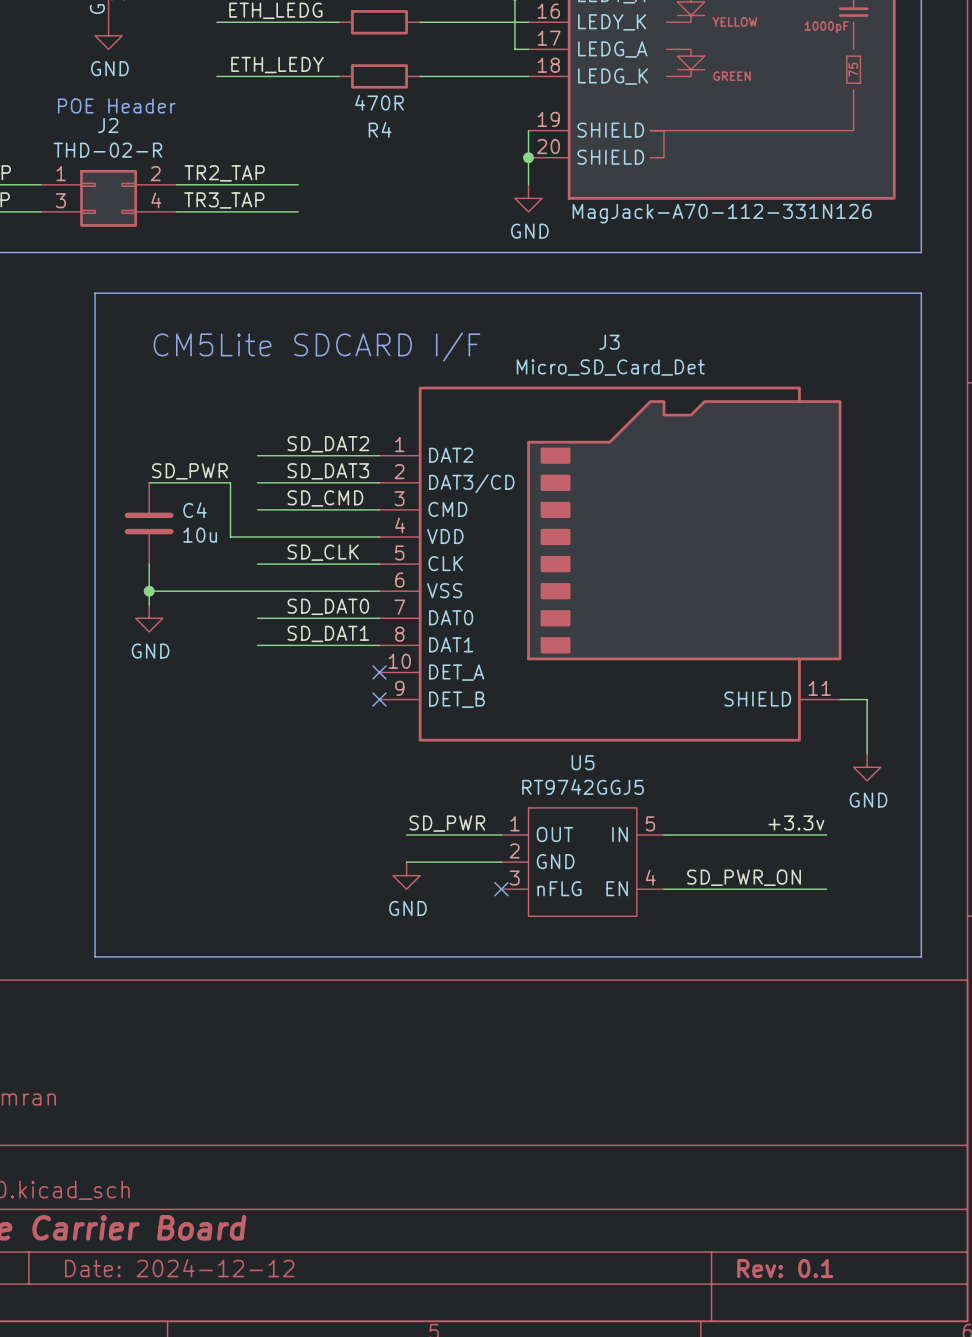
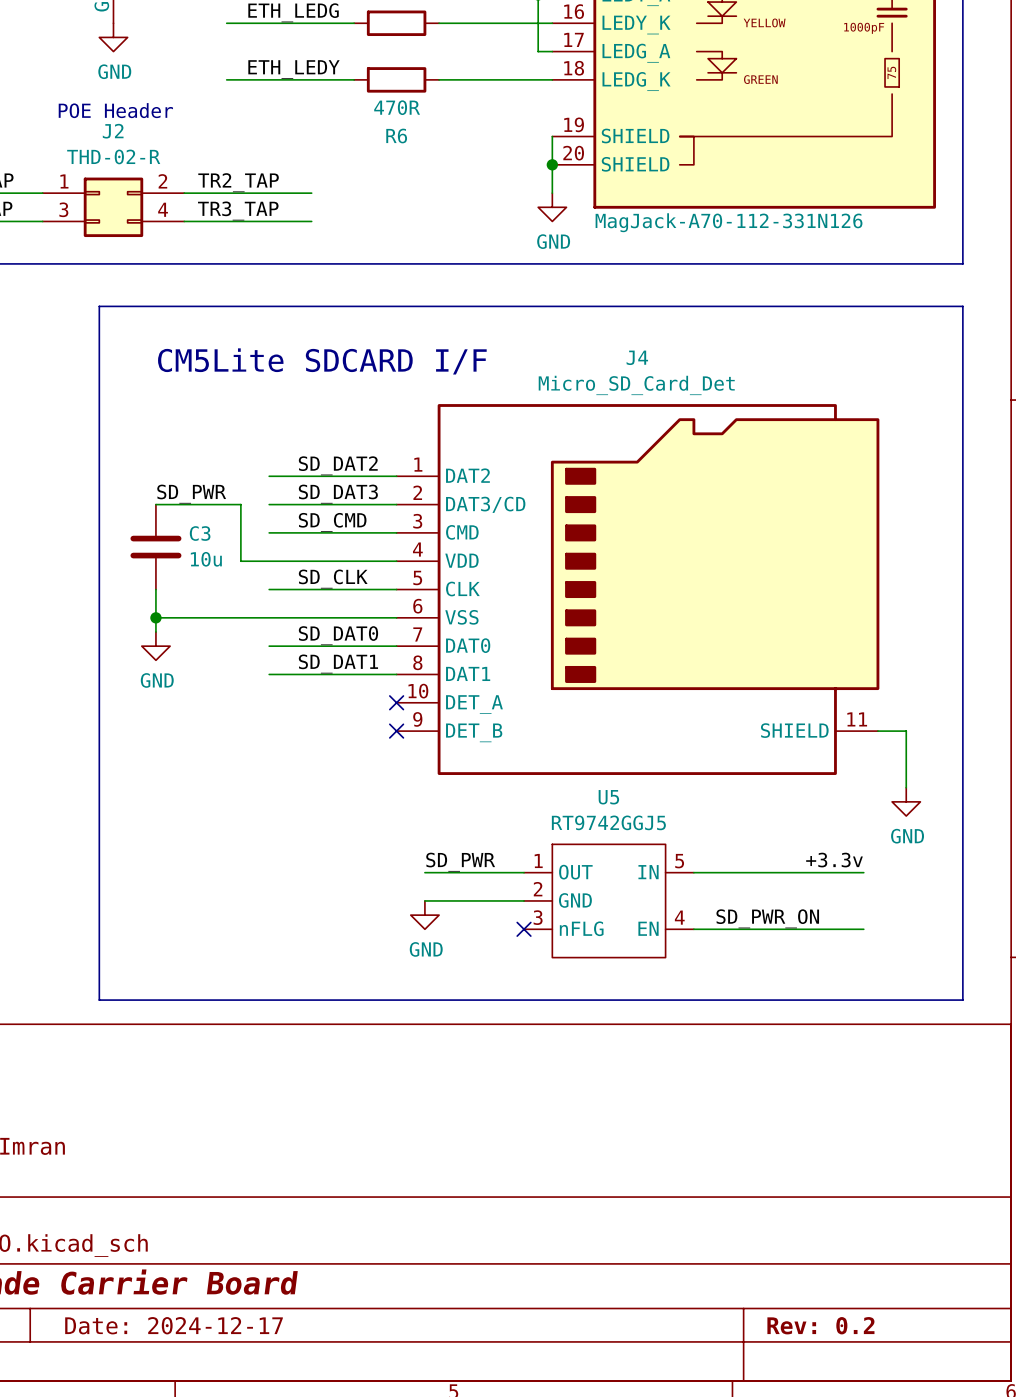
R4 name: R4 (380, 129) -> R6 (396, 136)
J3 name: J3 (609, 342) -> J4 (637, 357)
C4 name: C4 (194, 510) -> C3 (200, 533)
title block: Date: 2024-12-12 (179, 1268) -> Date: 2024-12-17 (174, 1325)
title block: Rev: 0.1 (785, 1268) -> Rev: 0.2 (820, 1325)

